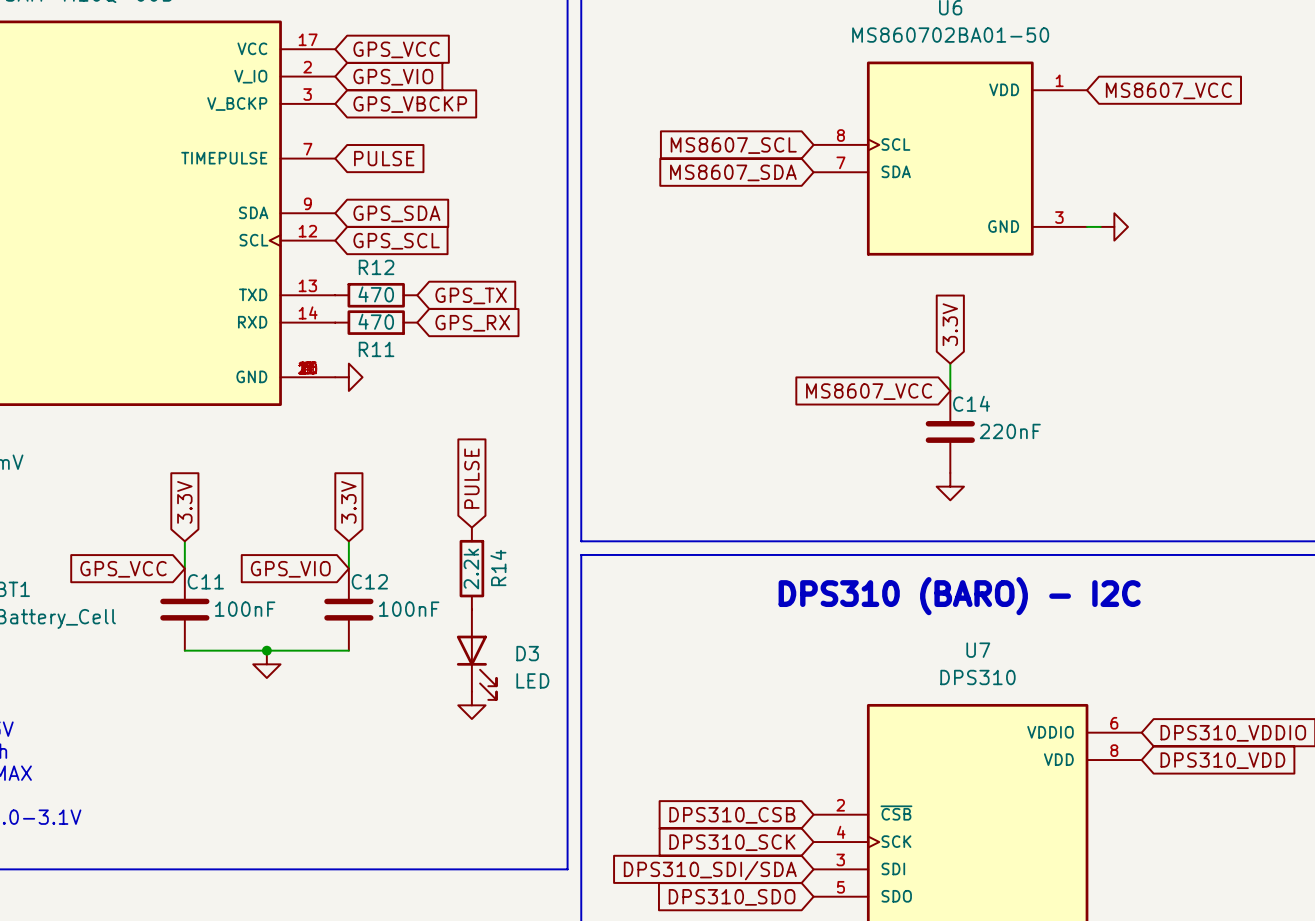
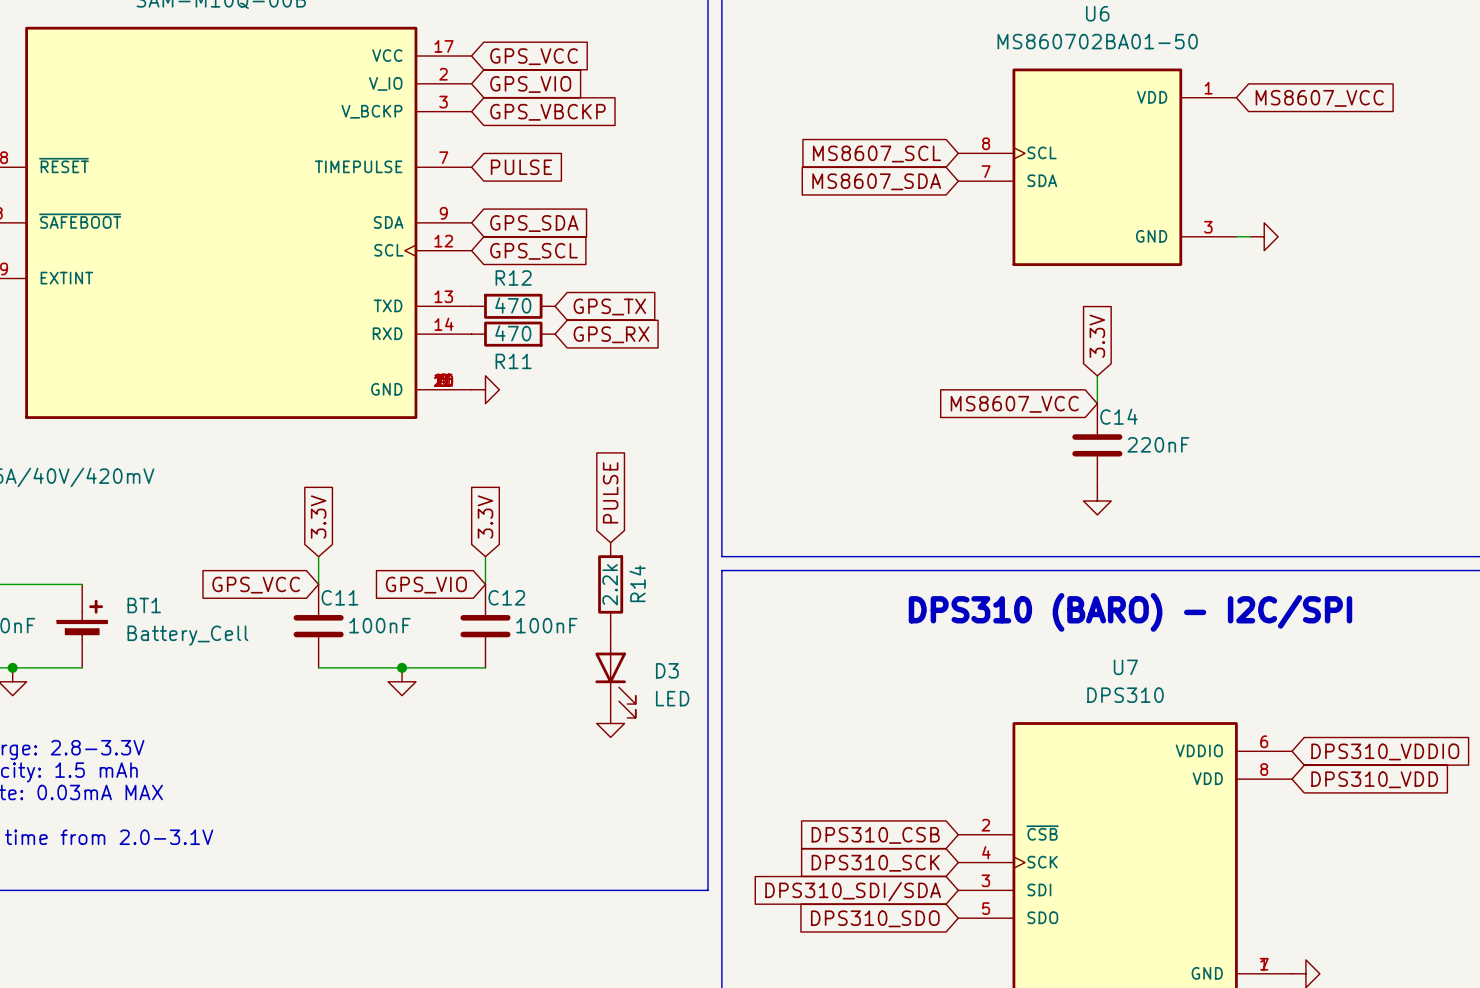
text: DPS310 (BARO) - I2C (959, 596) -> DPS310 (BARO) - I2C/SPI (1130, 612)

